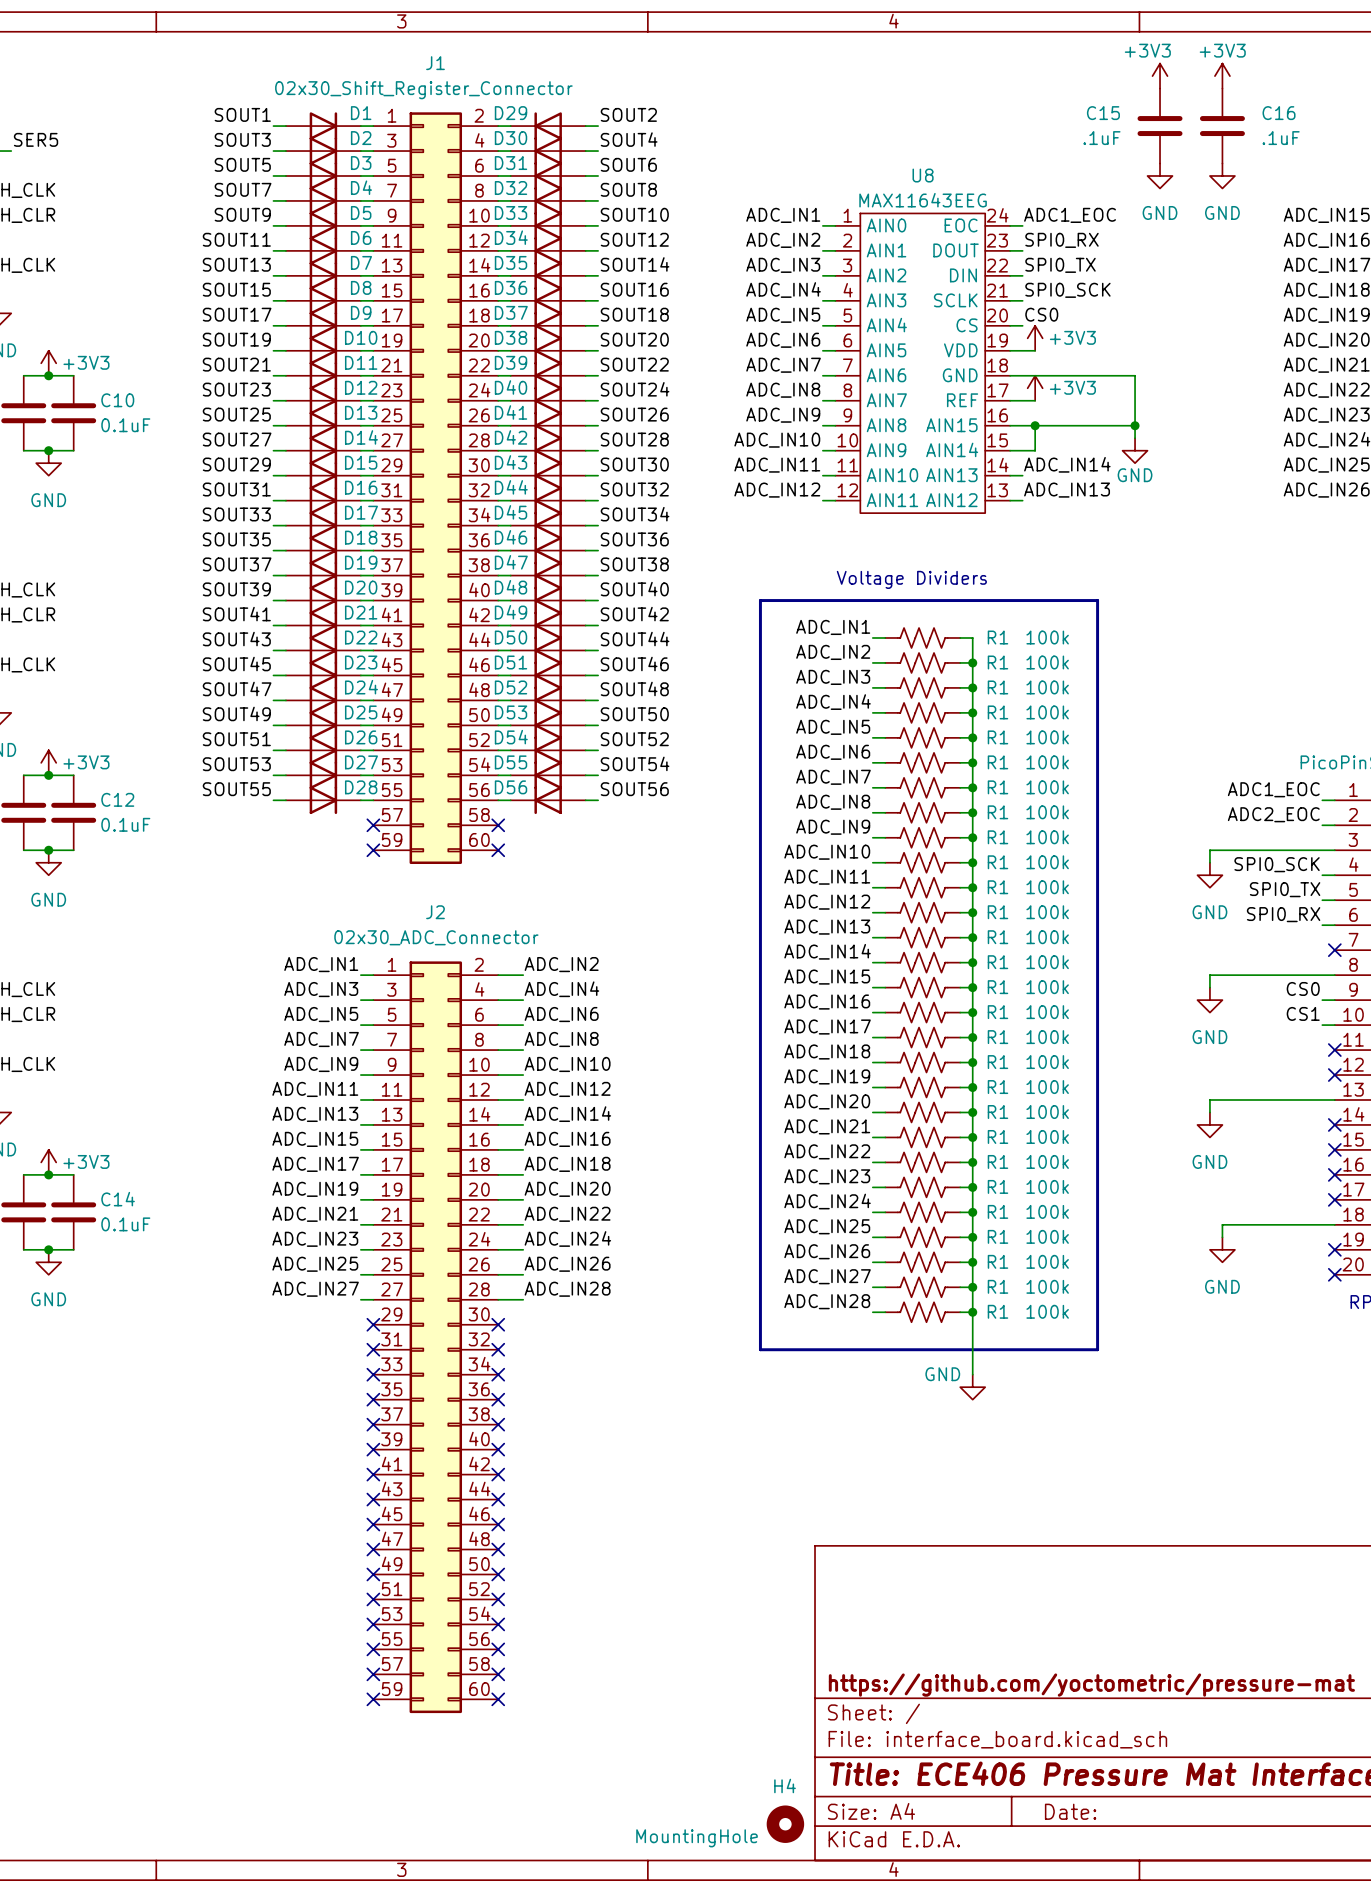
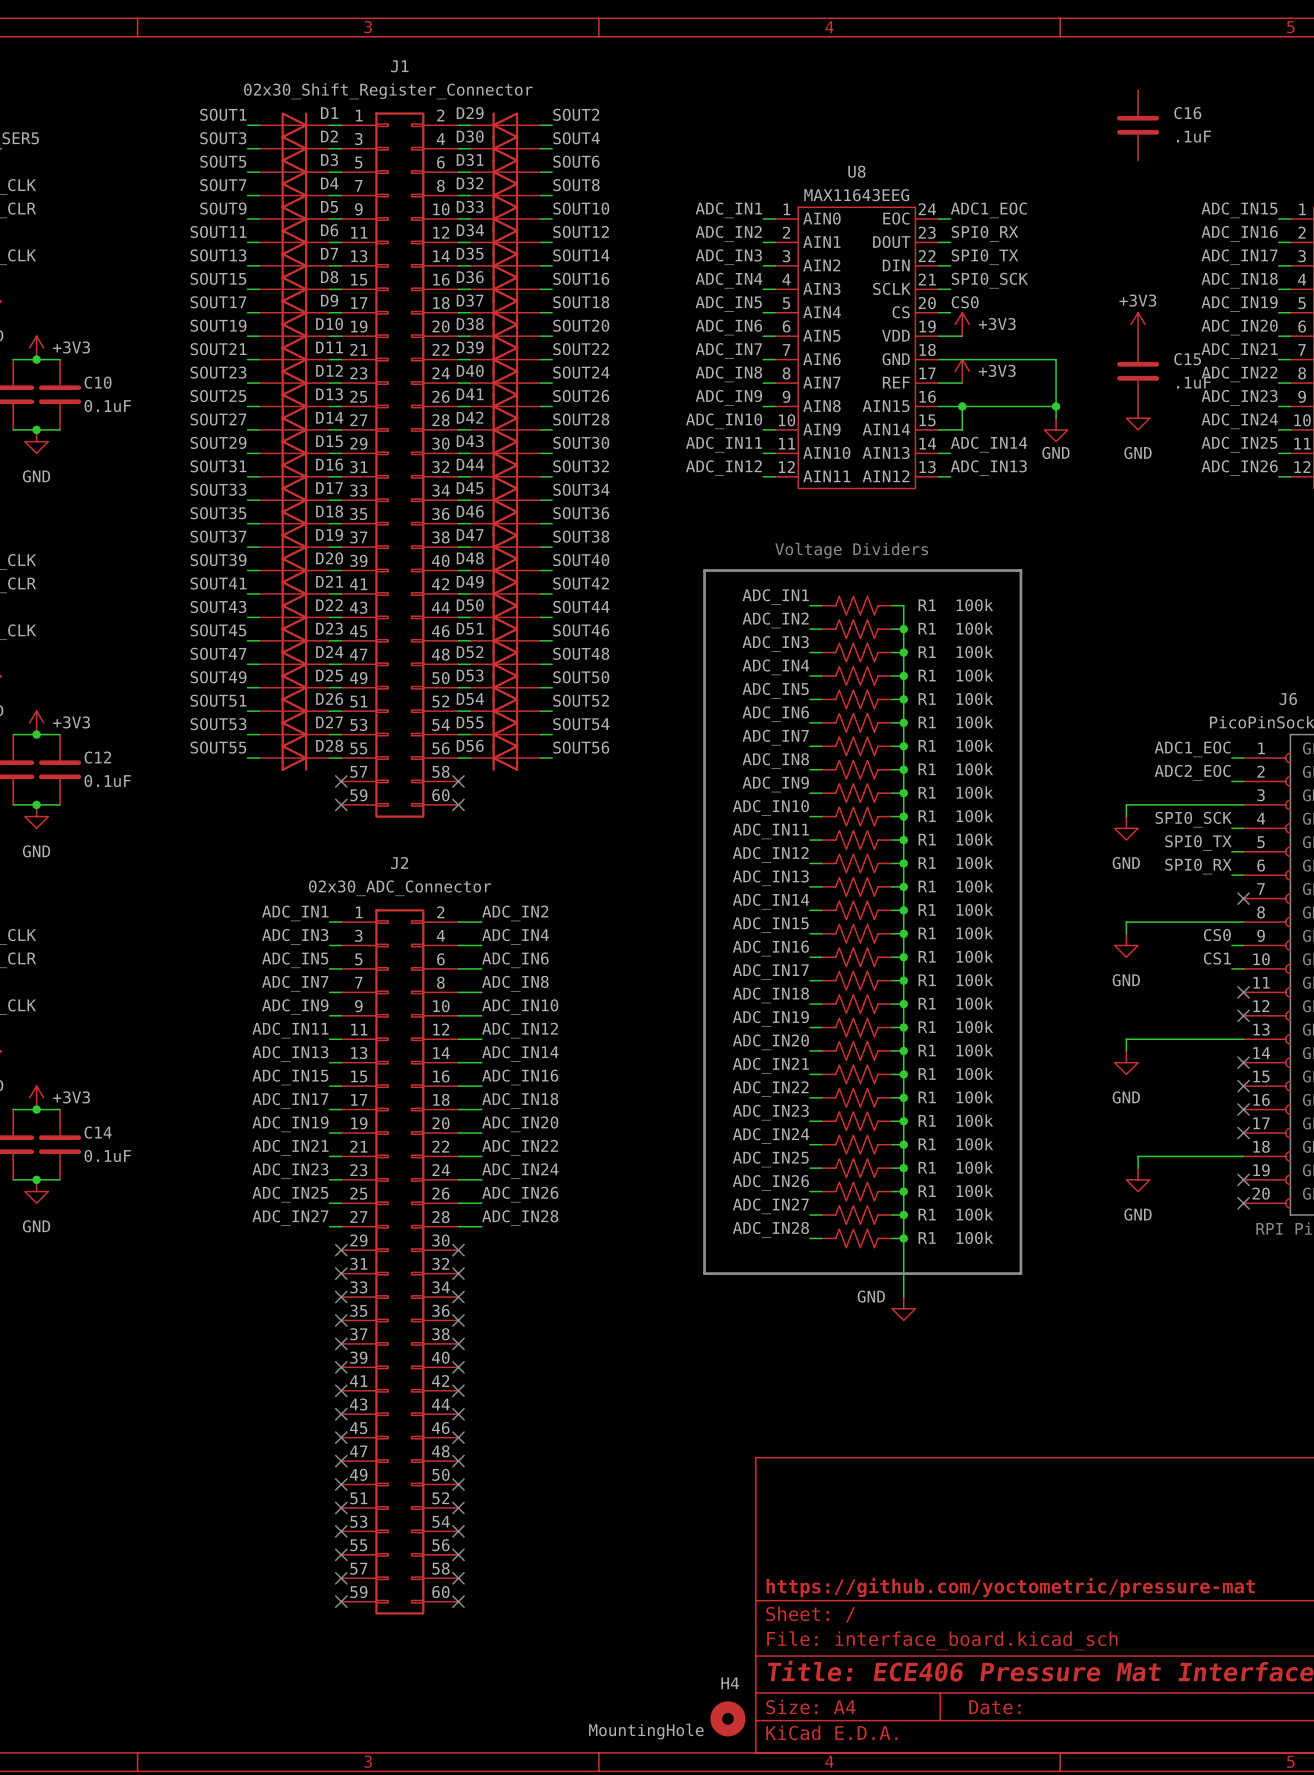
power symbol: +3V3 (1160, 76) -> none
power symbol: +3V3 (1222, 76) -> none
C15 name position: C15 (1103, 113) -> C15 (1187, 359)
C15 position: (1160, 126) -> (1138, 371)
C15 value position: .1uF (1101, 138) -> .1uF (1194, 382)
power symbol: GND (1160, 175) -> none
power symbol: GND (1222, 175) -> none
power symbol: none -> +3V3 (1138, 324)
power symbol: none -> GND (1138, 418)

